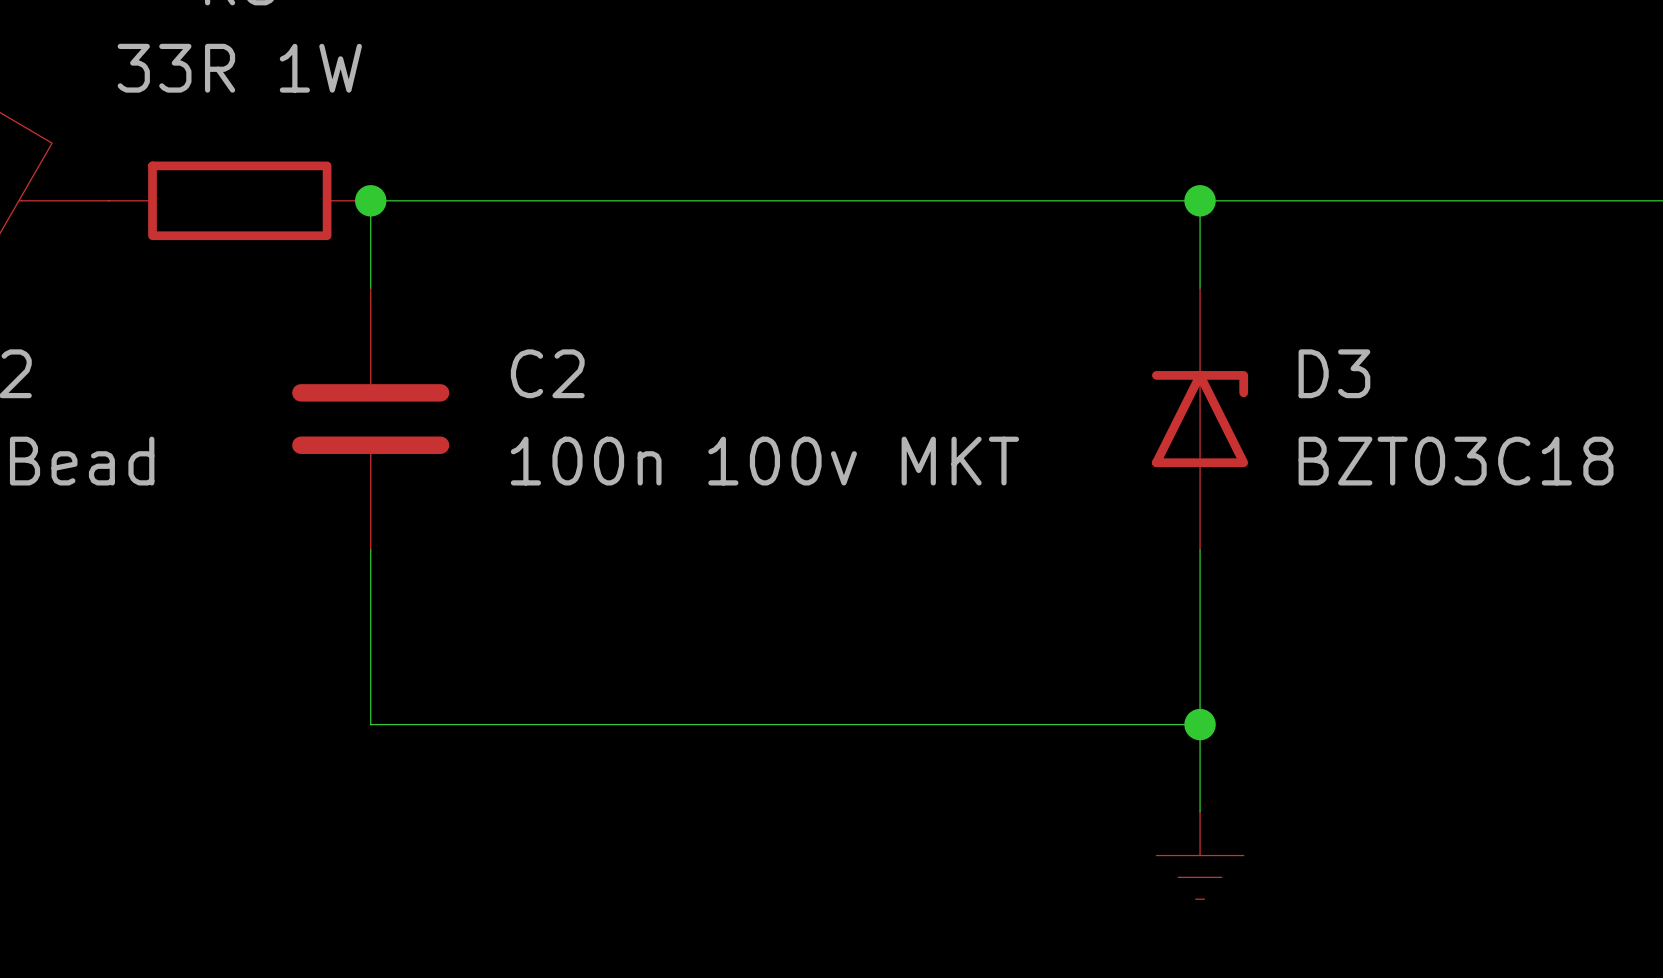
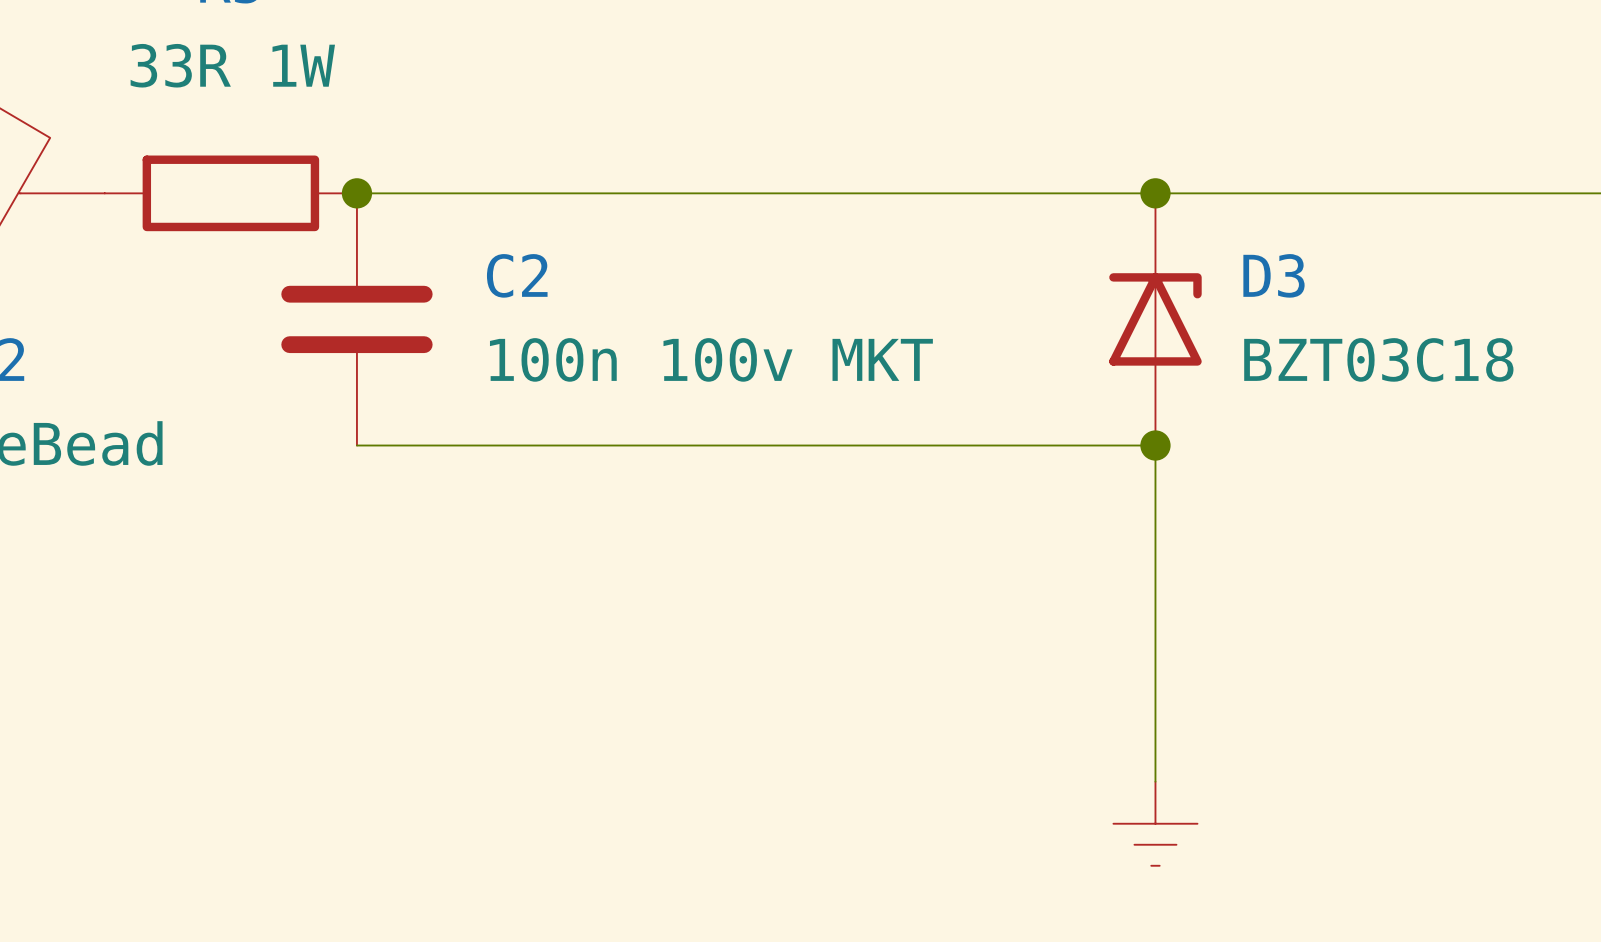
C2 position: (370, 419) -> (356, 319)
D3 position: (1200, 419) -> (1155, 319)
wire: none -> (356, 445) (1155, 445) (1155, 529)
junction: none -> (1155, 445)
wire: (370, 549) (370, 724) (1200, 724) -> none
junction: (1200, 724) -> none

